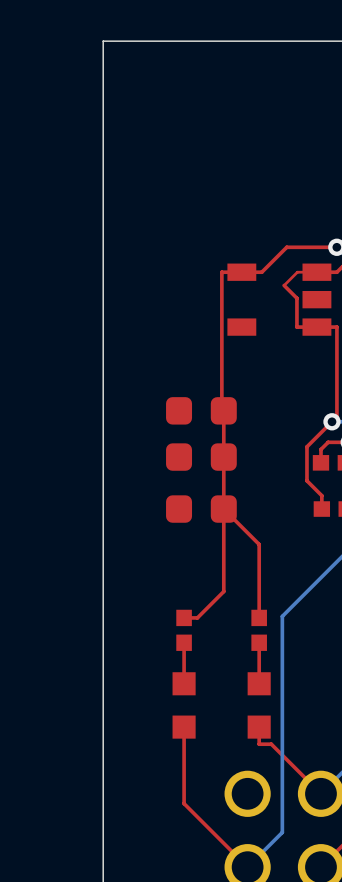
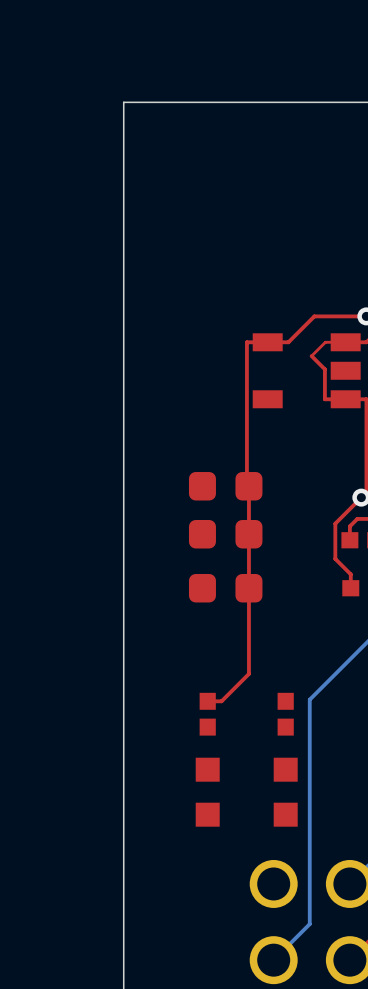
top track: (223, 509) (259, 544) (259, 617) -> none
top track: (184, 642) (184, 683) -> none
top track: (259, 642) (259, 683) -> none
top track: (184, 727) (184, 803) (247, 867) -> none
top track: (259, 727) (259, 744) (271, 744) (320, 793) -> none

